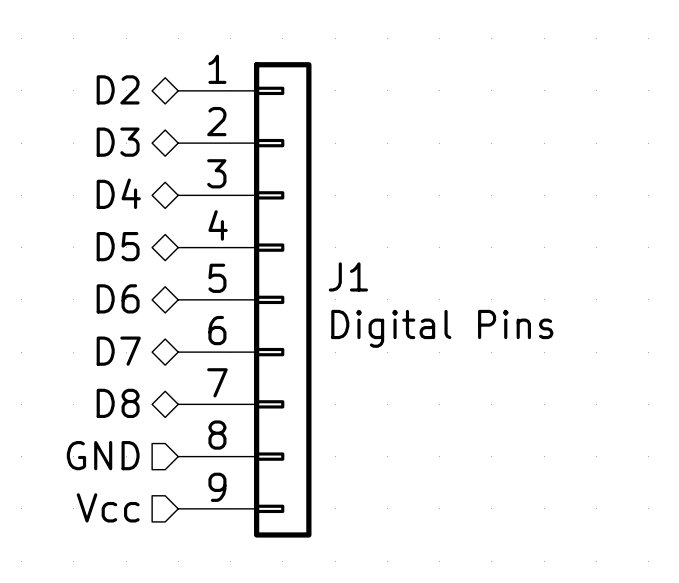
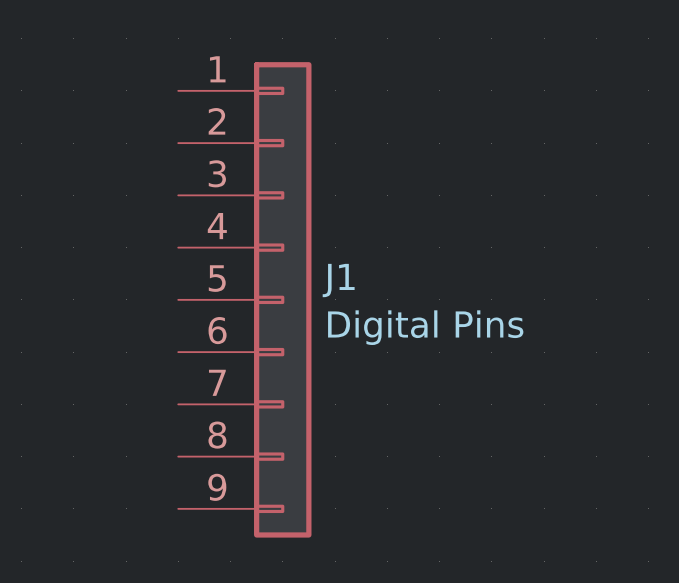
hierarchical label: D2 (118, 89) -> none
hierarchical label: D3 (118, 142) -> none
hierarchical label: D4 (118, 193) -> none
hierarchical label: D5 (118, 246) -> none
hierarchical label: D6 (118, 298) -> none
hierarchical label: D7 (118, 351) -> none
hierarchical label: D8 (118, 403) -> none
hierarchical label: GND (103, 455) -> none
hierarchical label: Vcc (108, 507) -> none

